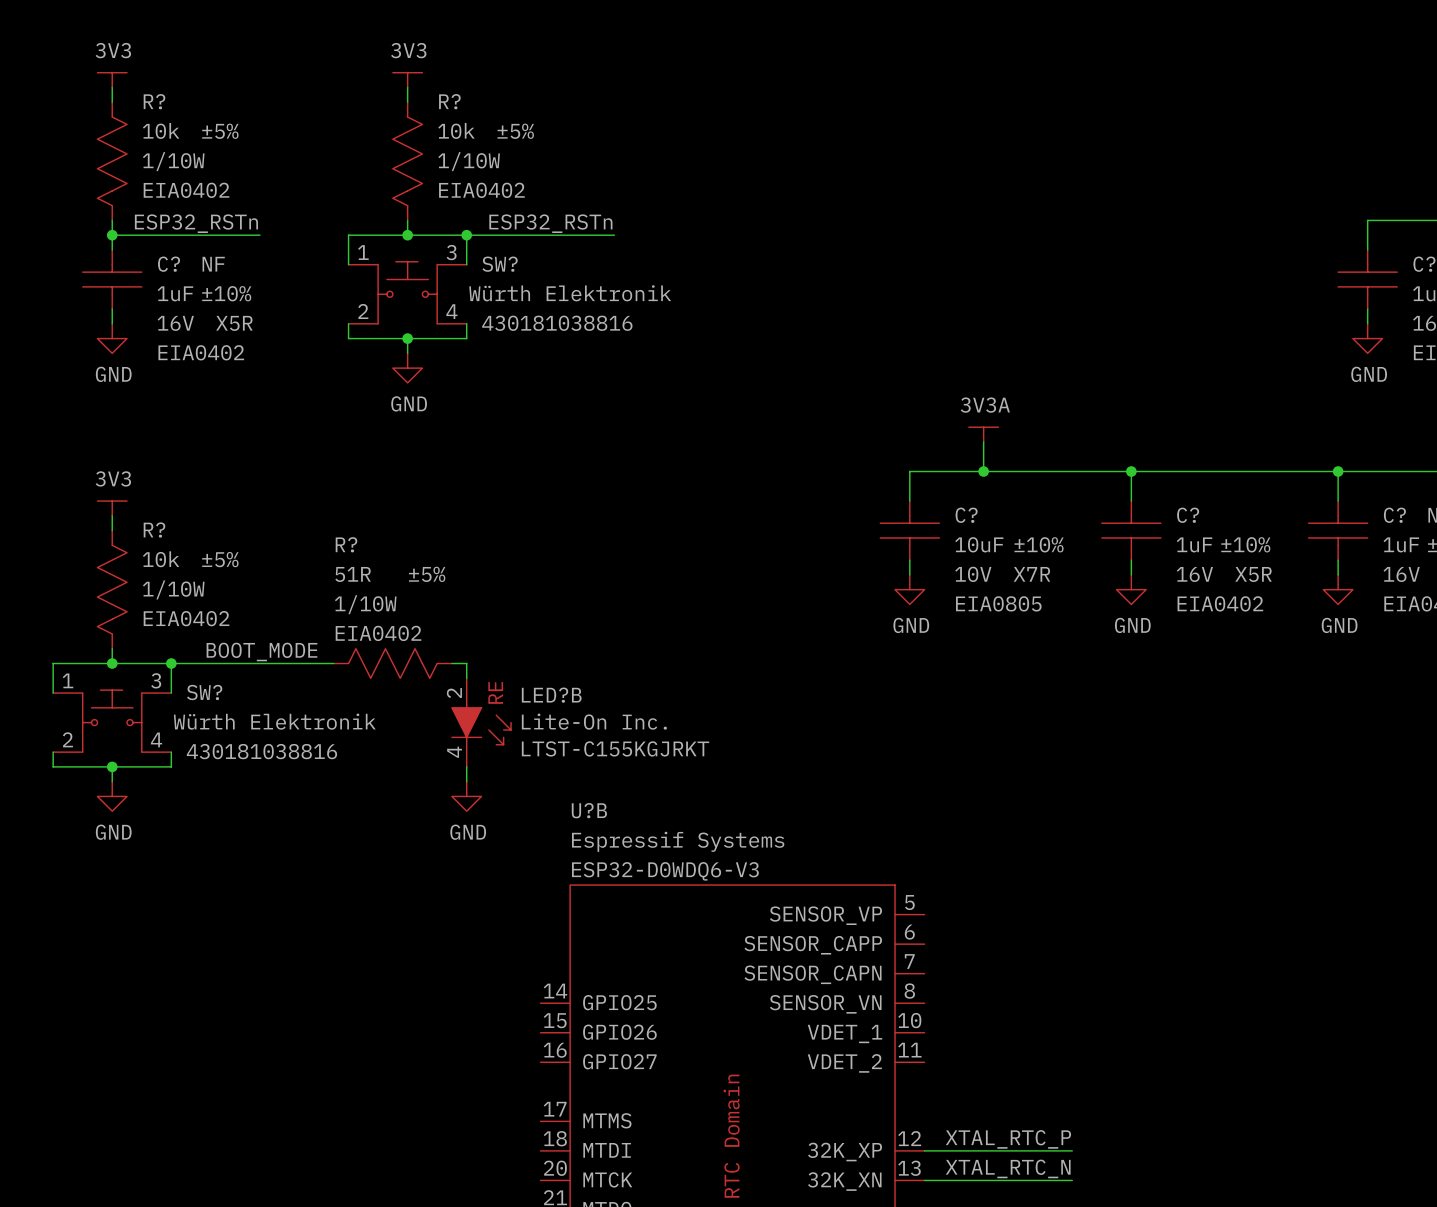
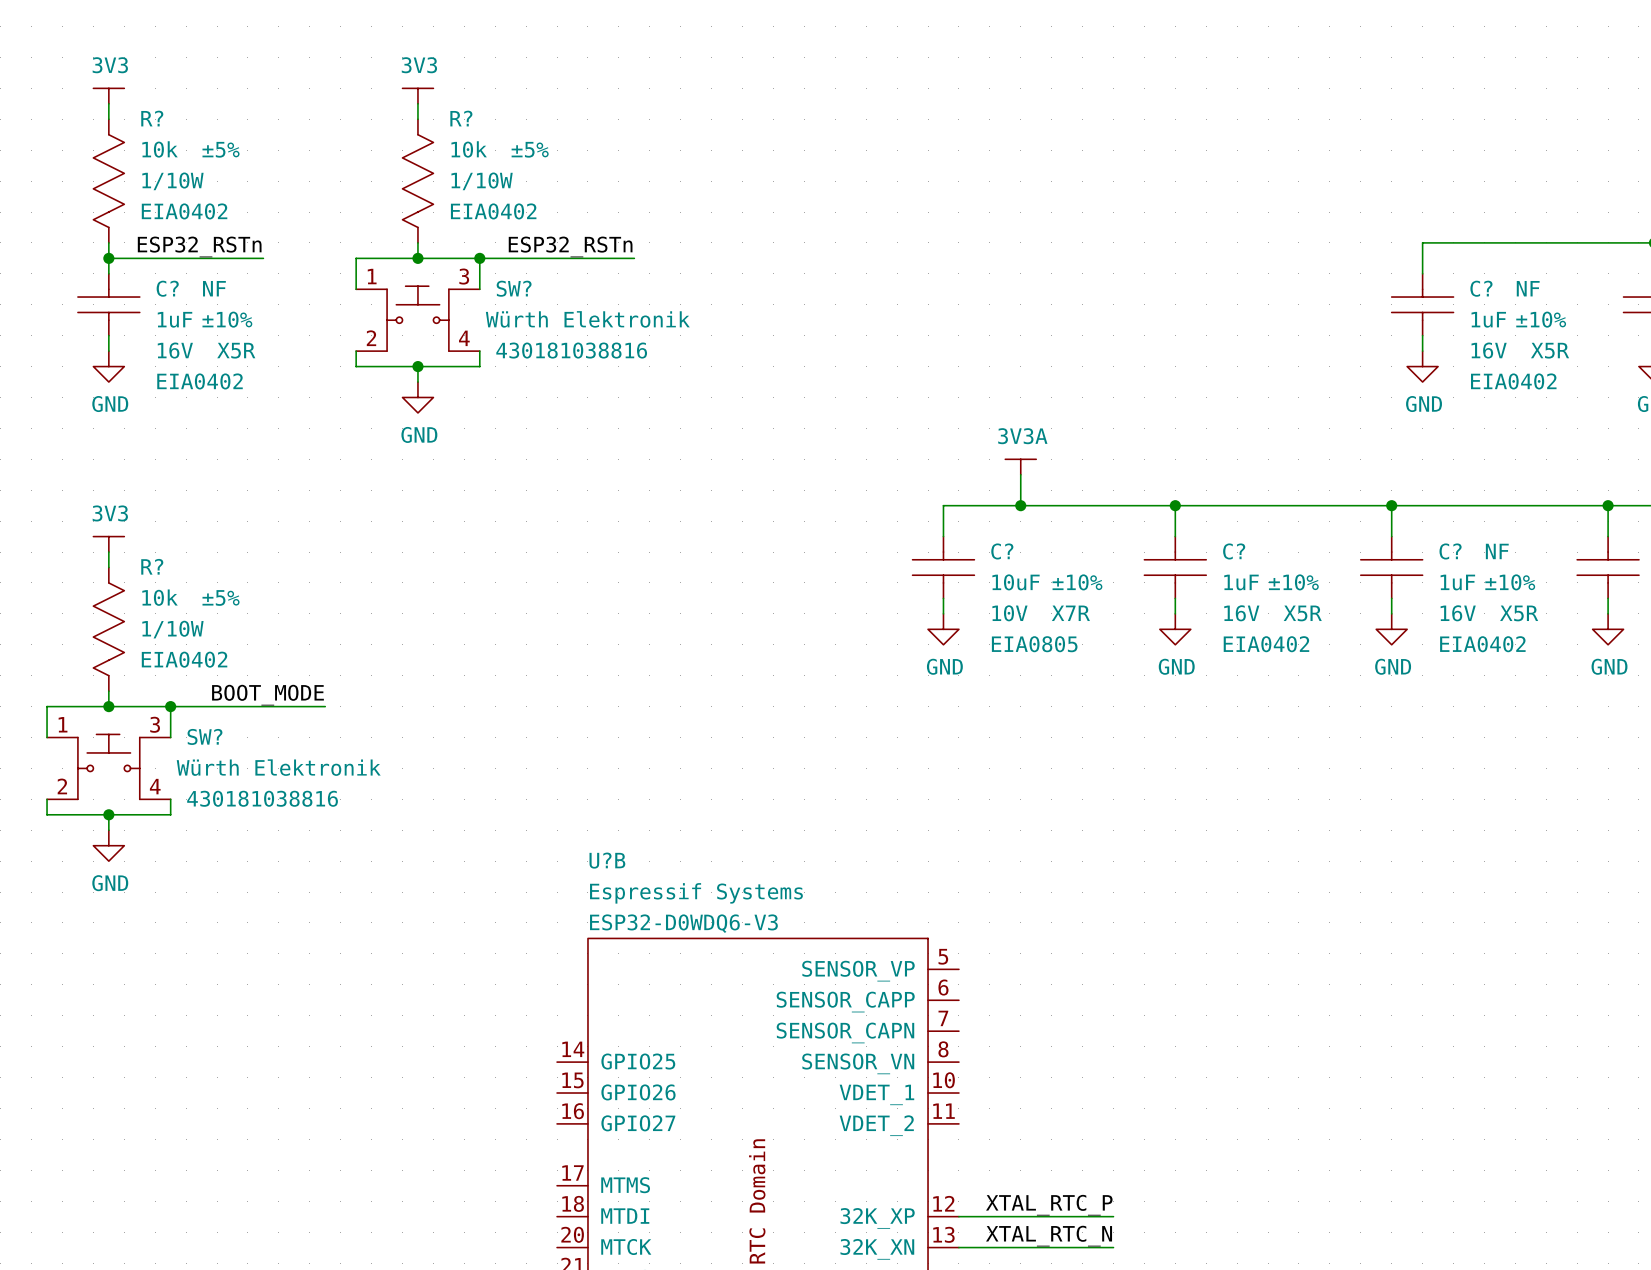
wire: (319, 663) (333, 663) -> none
R?: (392, 663) -> none
wire: (451, 663) (466, 663) (466, 678) -> none
LED?B: (481, 722) -> none
wire: (466, 766) (466, 781) -> none
power symbol: GND (466, 796) -> none

